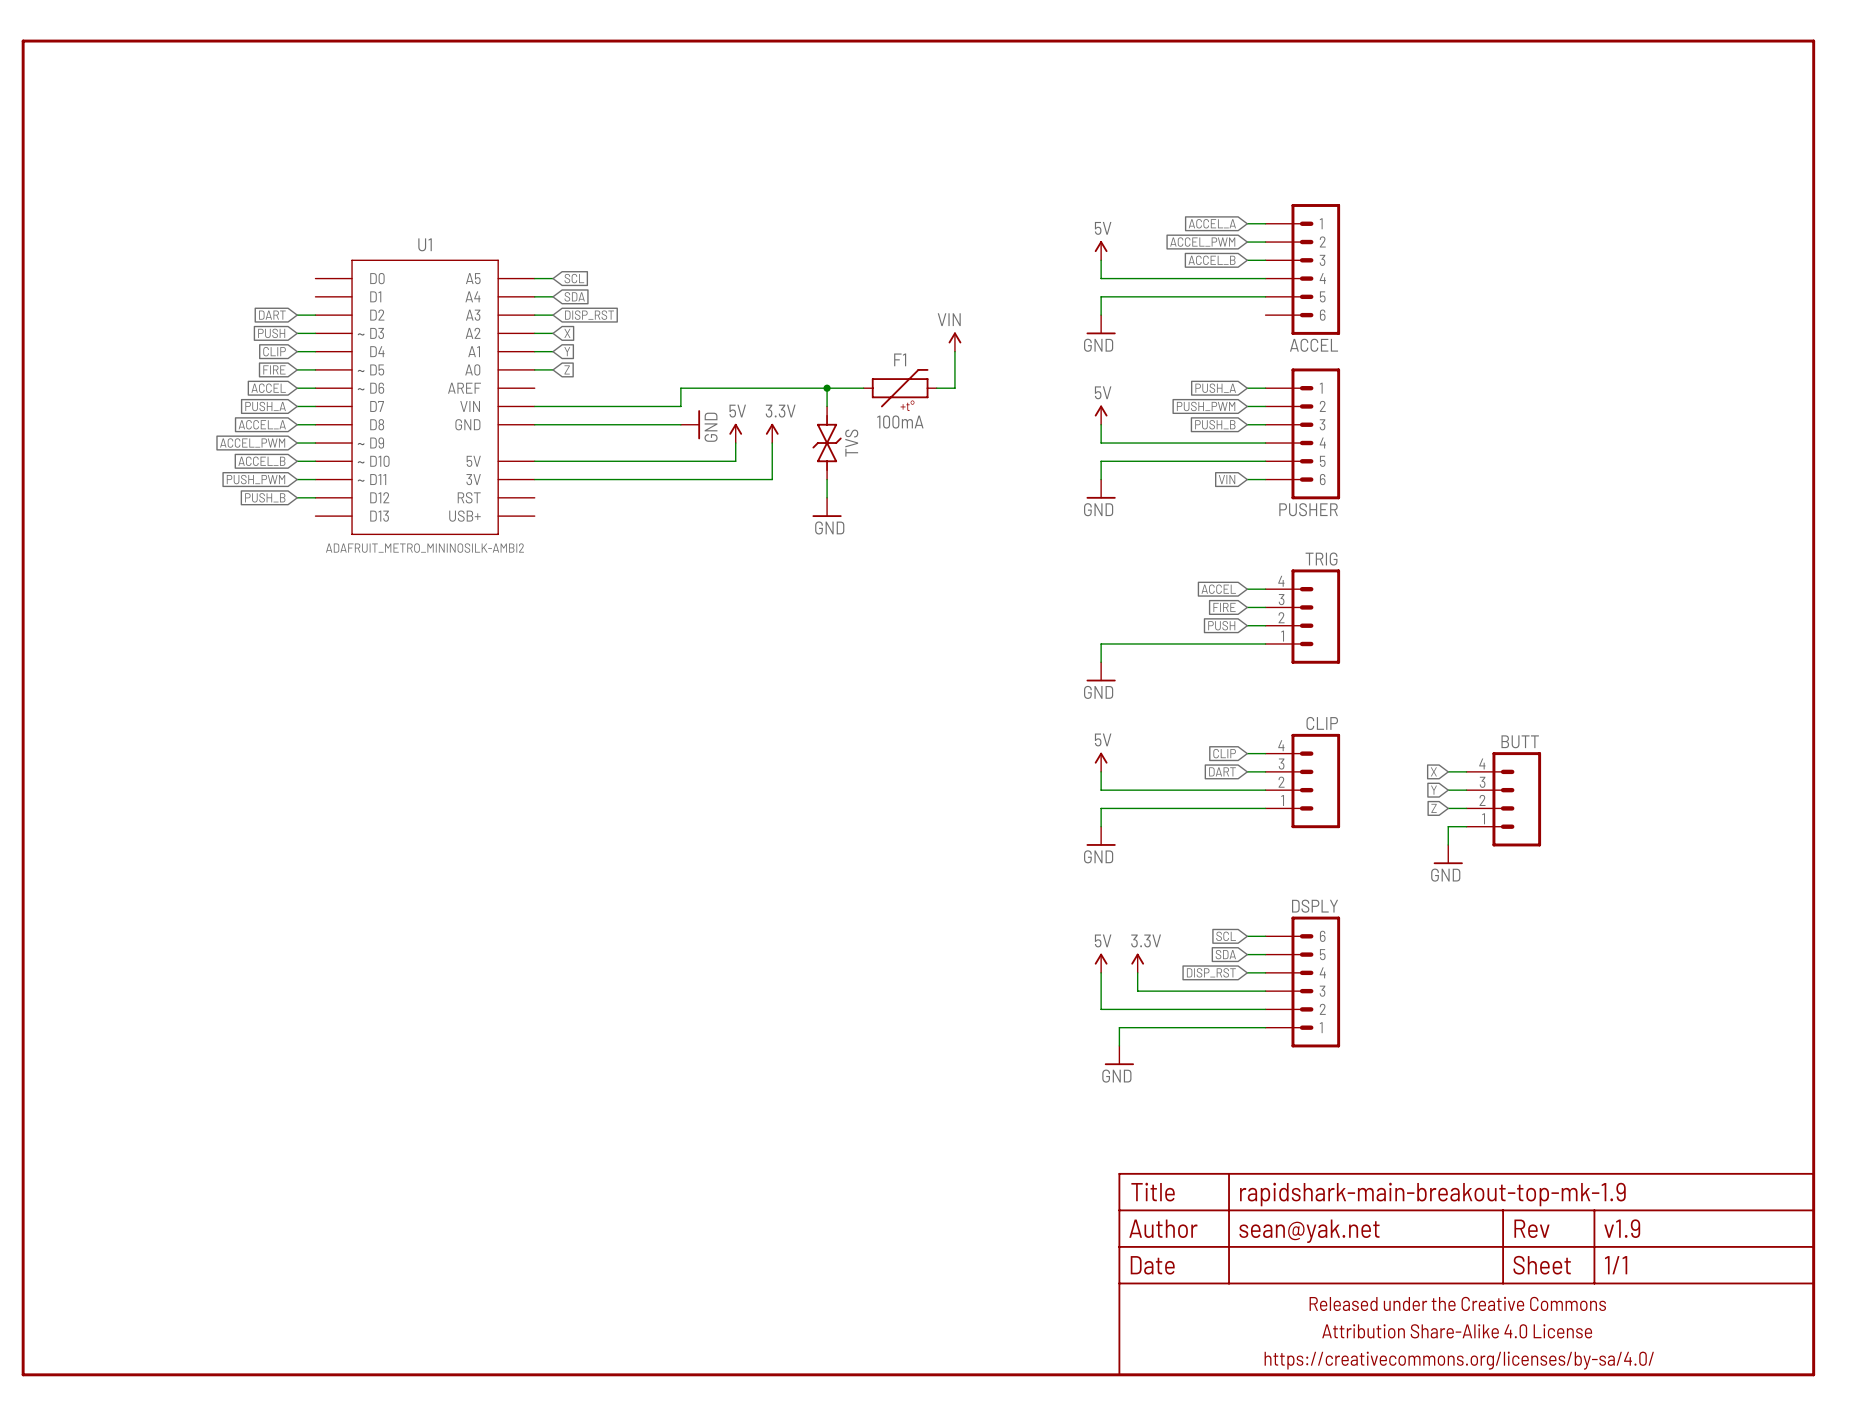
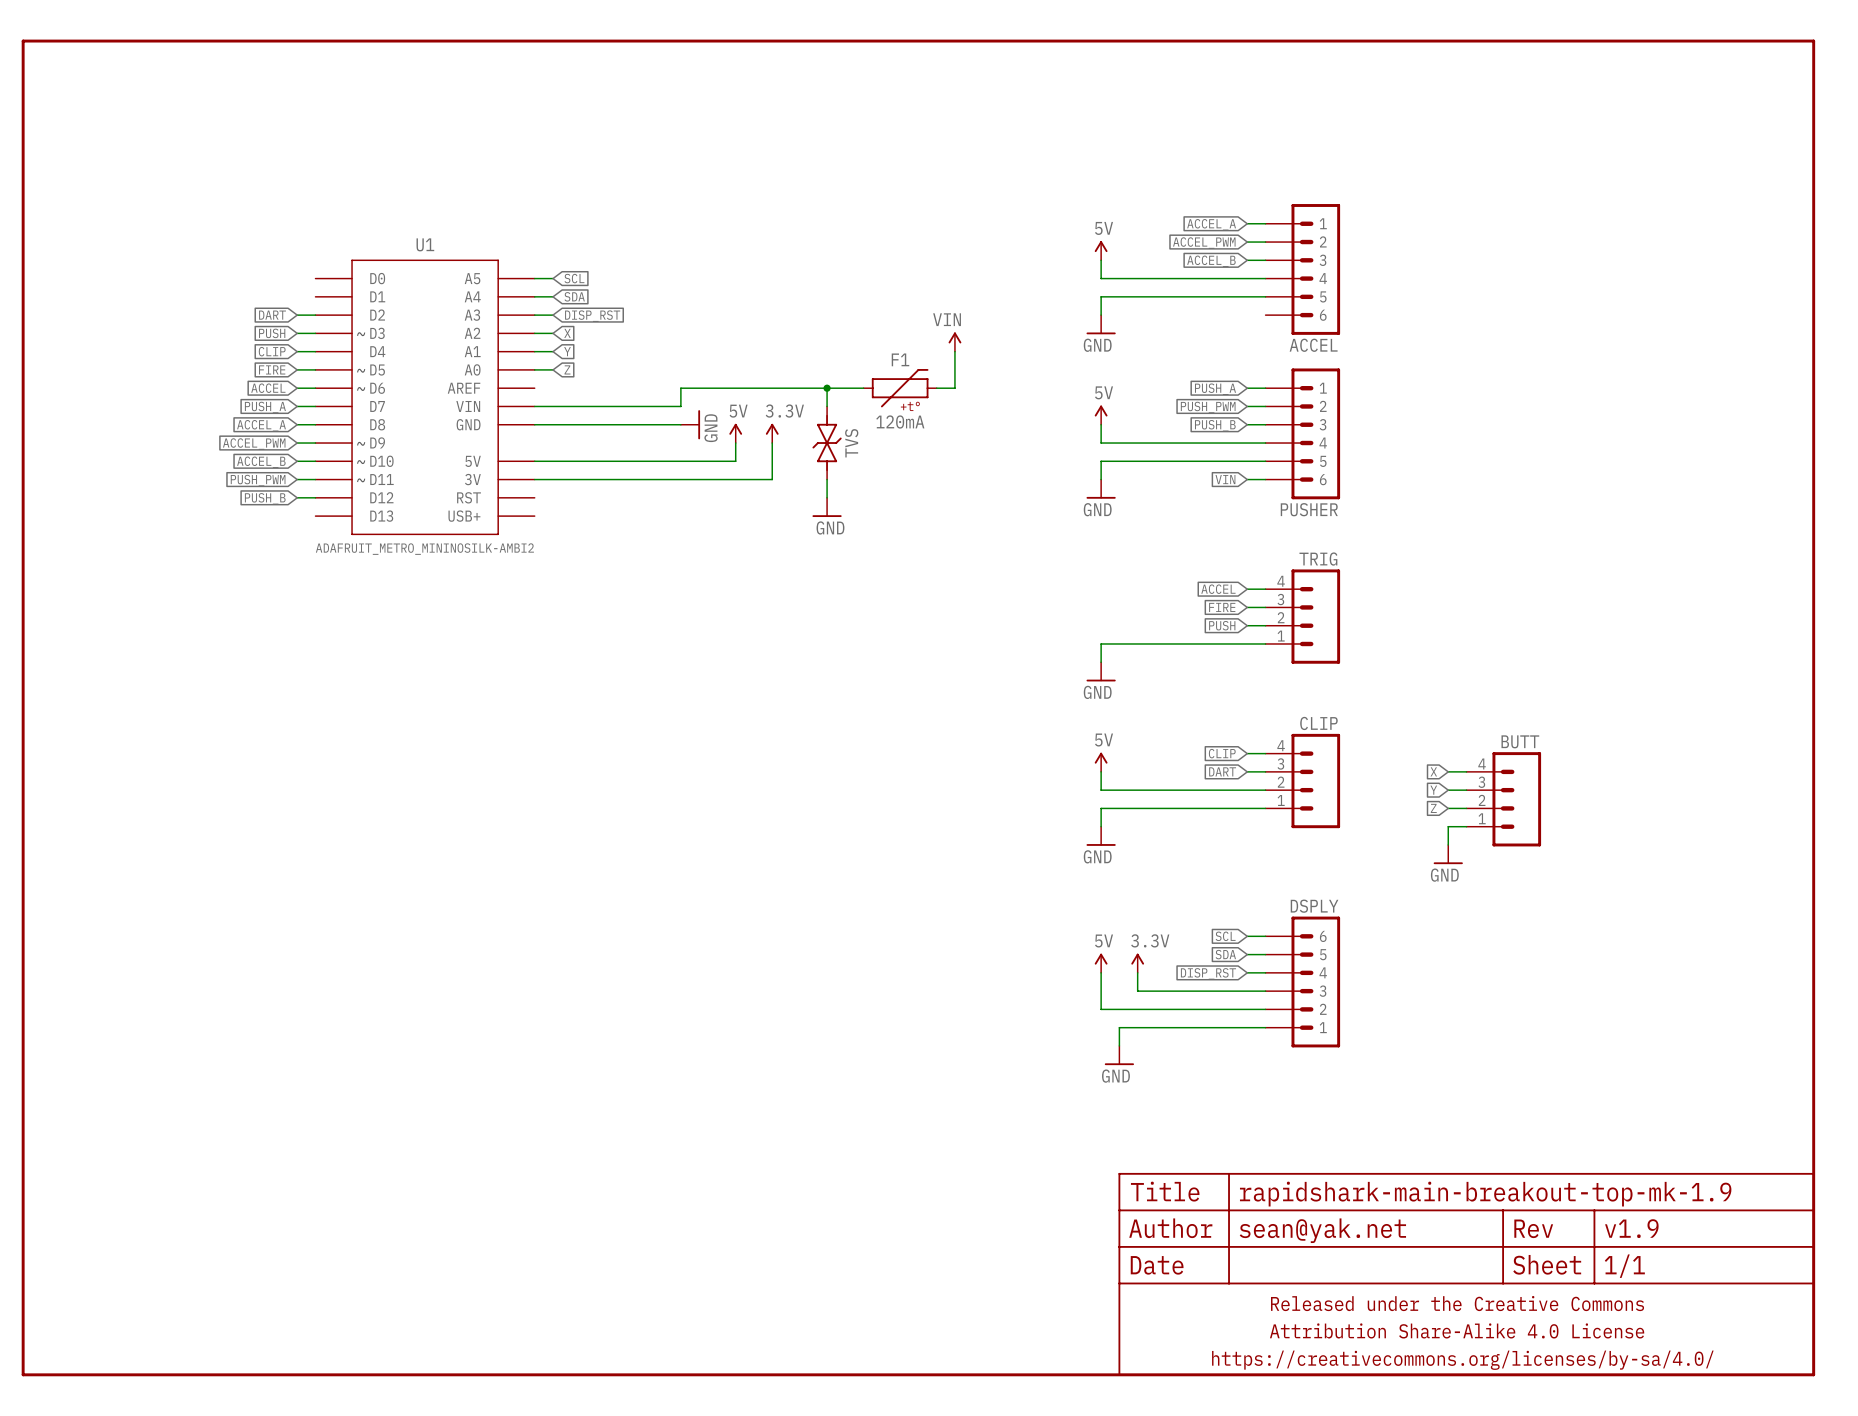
F1 value: 100mA (900, 422) -> 120mA (900, 422)

